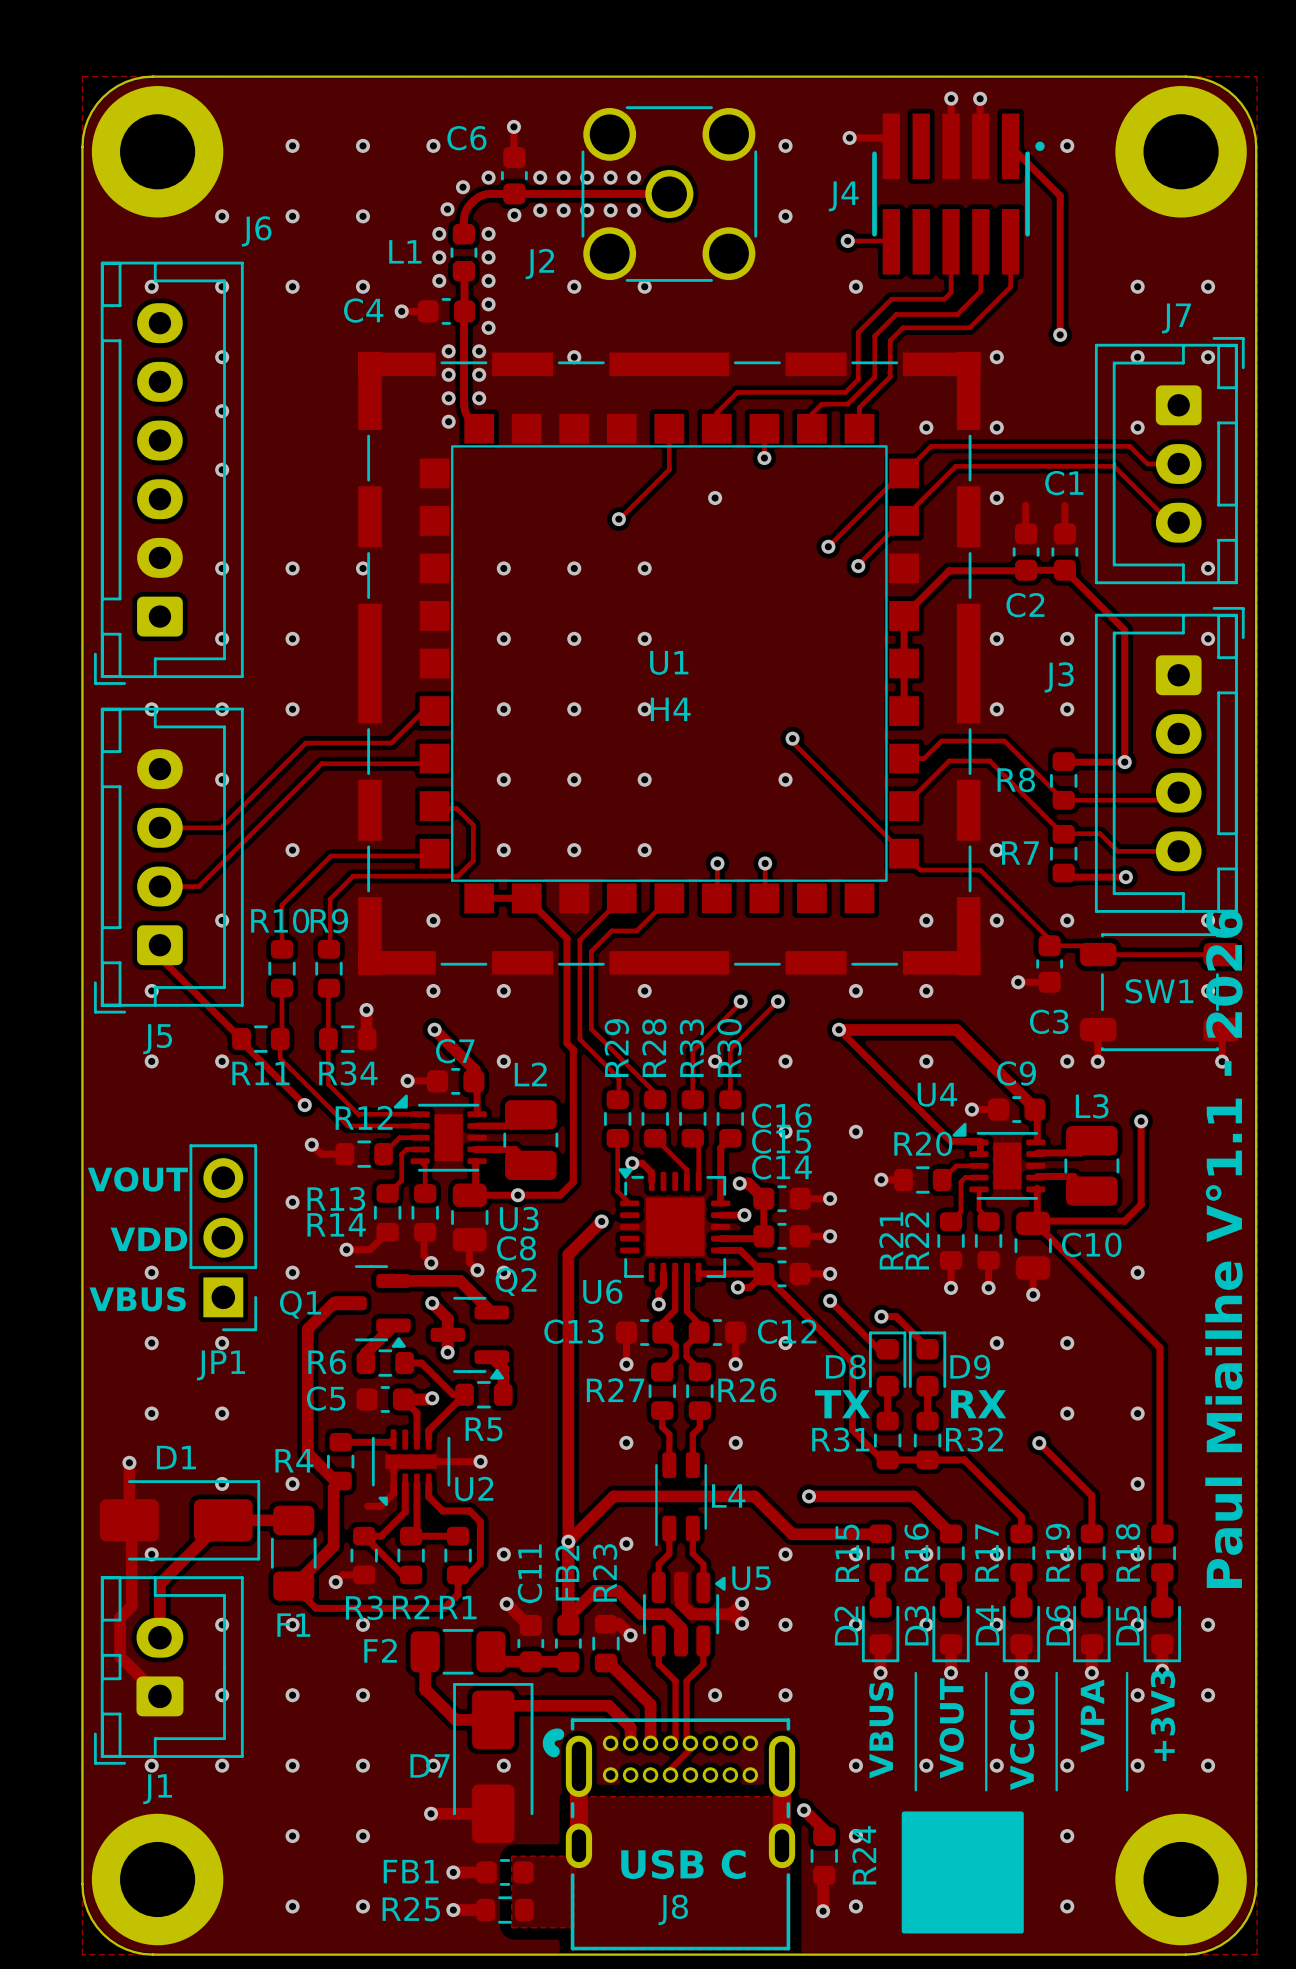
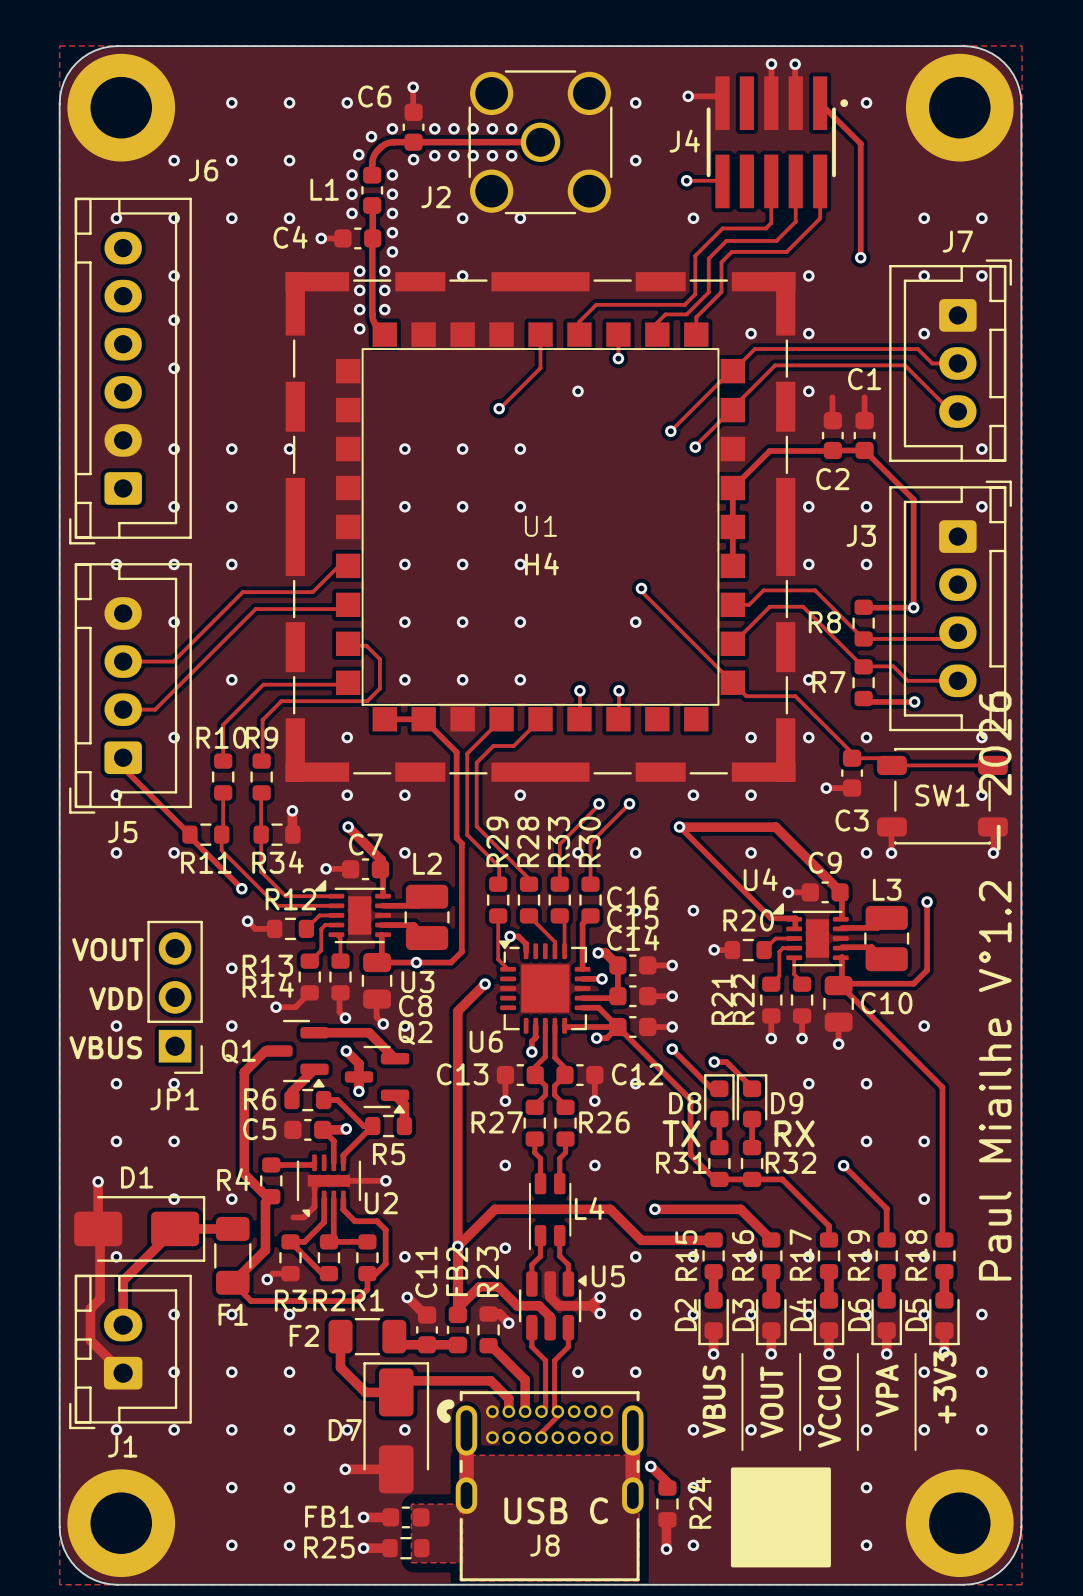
text: Paul Miailhe V°1.1 - 2026 (1223, 1248) -> Paul Miailhe V°1.2 - 2026 (995, 985)

